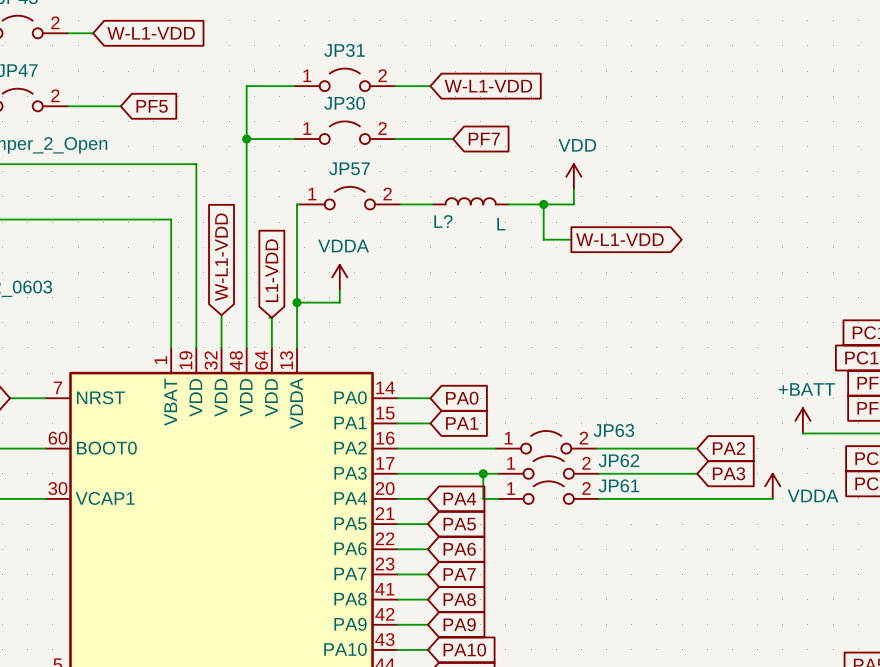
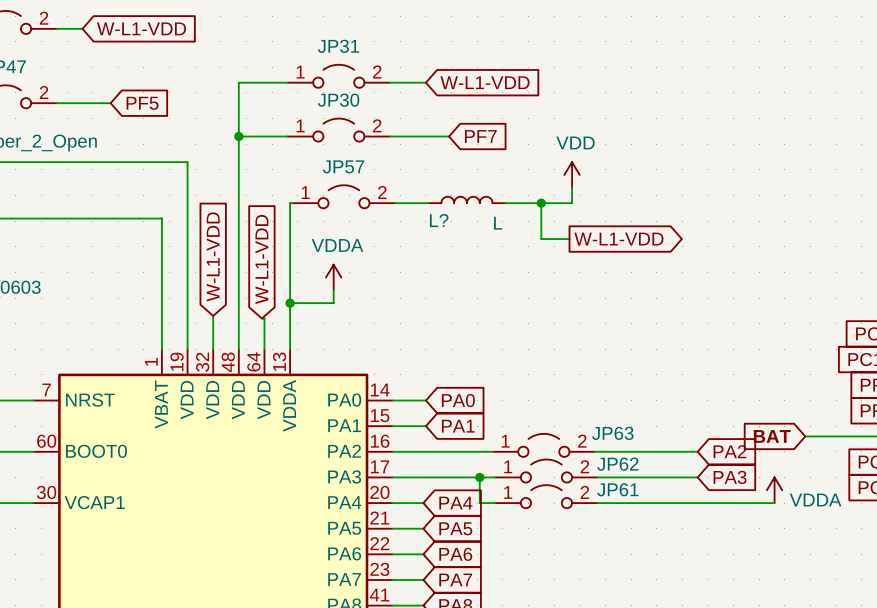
global label: L1-VDD (271, 270) -> W-L1-VDD (261, 259)
power symbol: +BATT (802, 420) -> none
global label: none -> BAT (772, 436)

